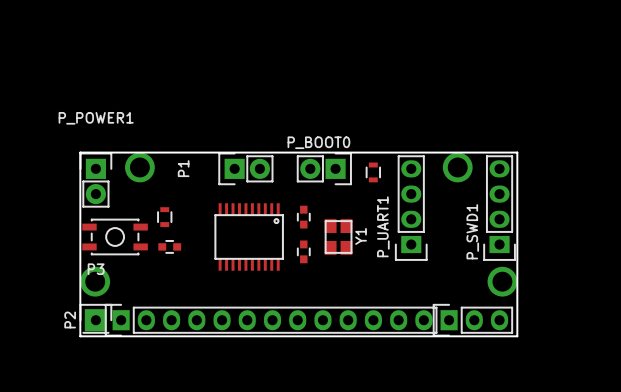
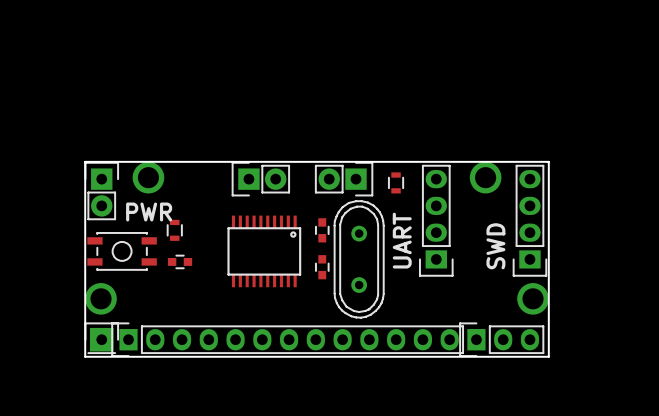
P_POWER1 name: P_POWER1 (96, 118) -> none
P_BOOT0 name: P_BOOT0 (318, 142) -> none
P1 name: P1 (183, 168) -> none
text: none -> PWR (149, 212)
text: none -> UART (402, 240)
P_UART1 name: P_UART1 (383, 226) -> none
P_SWD1 name: P_SWD1 (472, 231) -> none
text: none -> SWD (495, 246)
Y1: (338, 236) -> none
part: none -> (359, 259)
P3 name: P3 (96, 269) -> none
P2 name: P2 (70, 319) -> none

